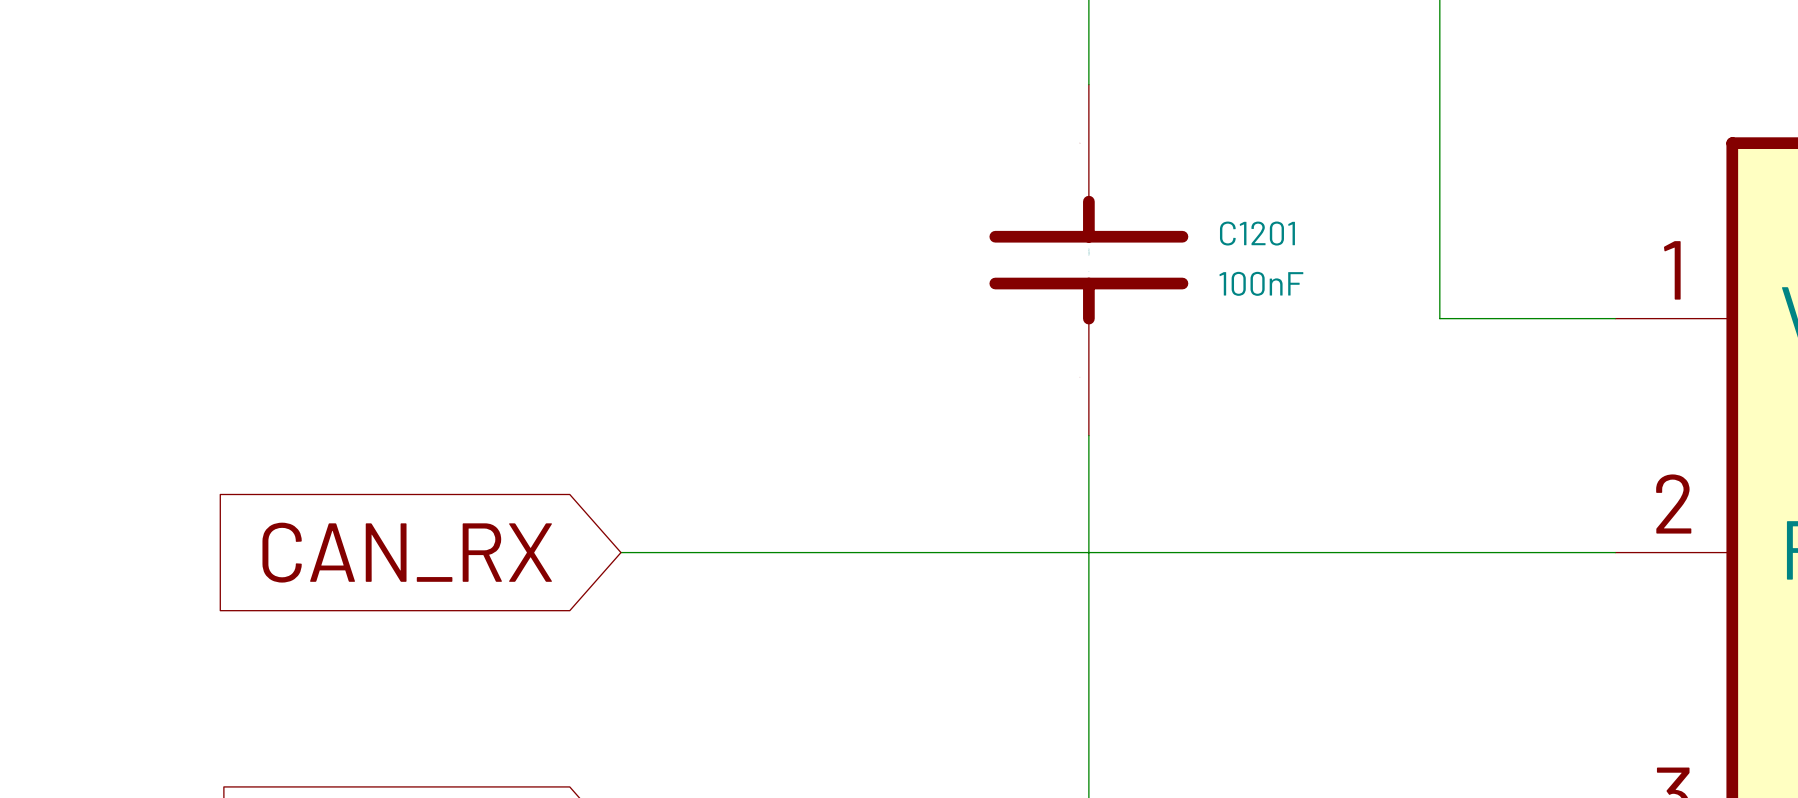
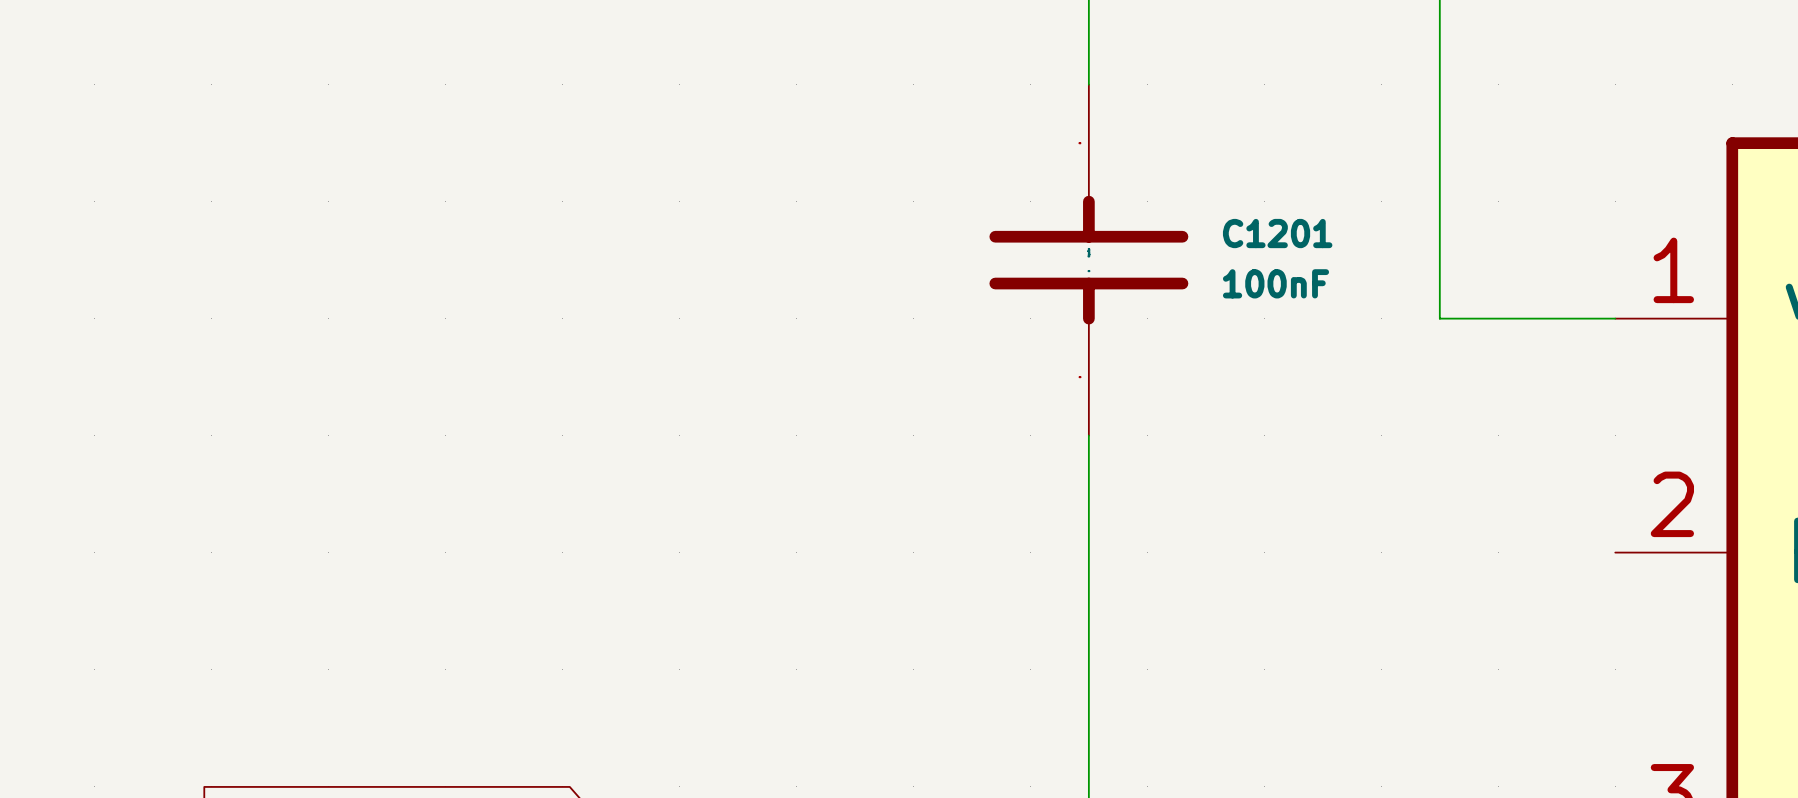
global label: CAN_RX (407, 552) -> none
wire: (620, 552) (1615, 552) -> none

